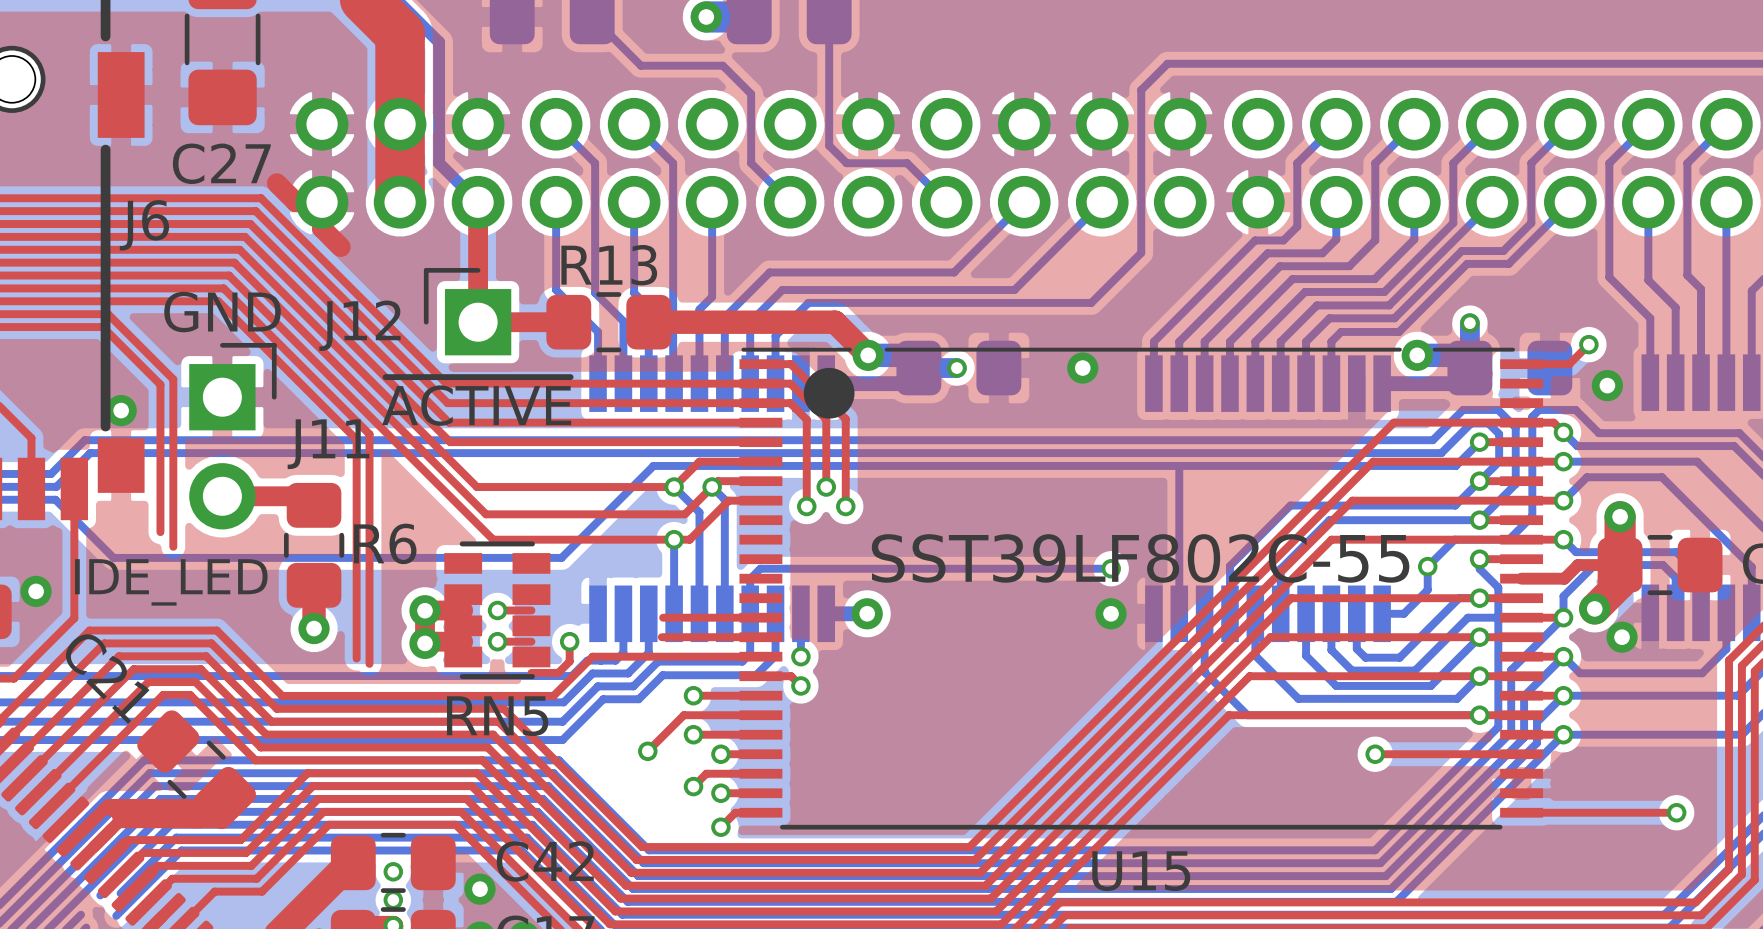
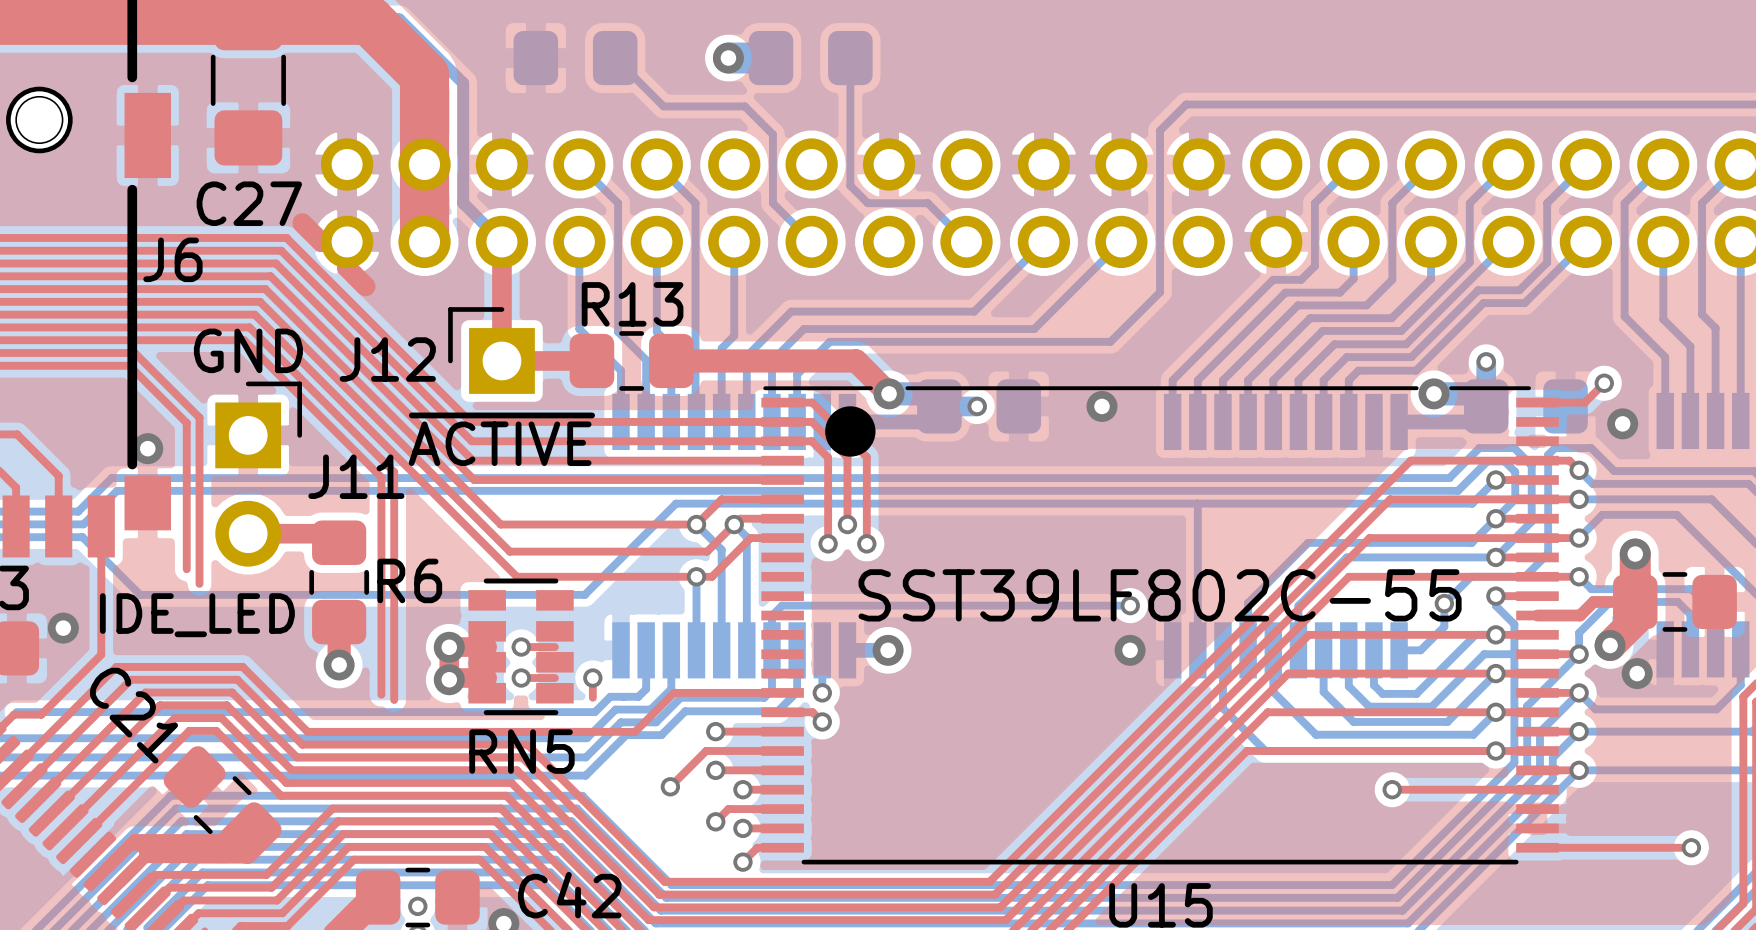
top track: (663, 617) (760, 617) -> none
top track: (661, 637) (760, 637) -> none
top track: (651, 656) (592, 656) (553, 695) -> (674, 692) (635, 731) (576, 731)
top track: (569, 661) (558, 672) (531, 672) -> none

